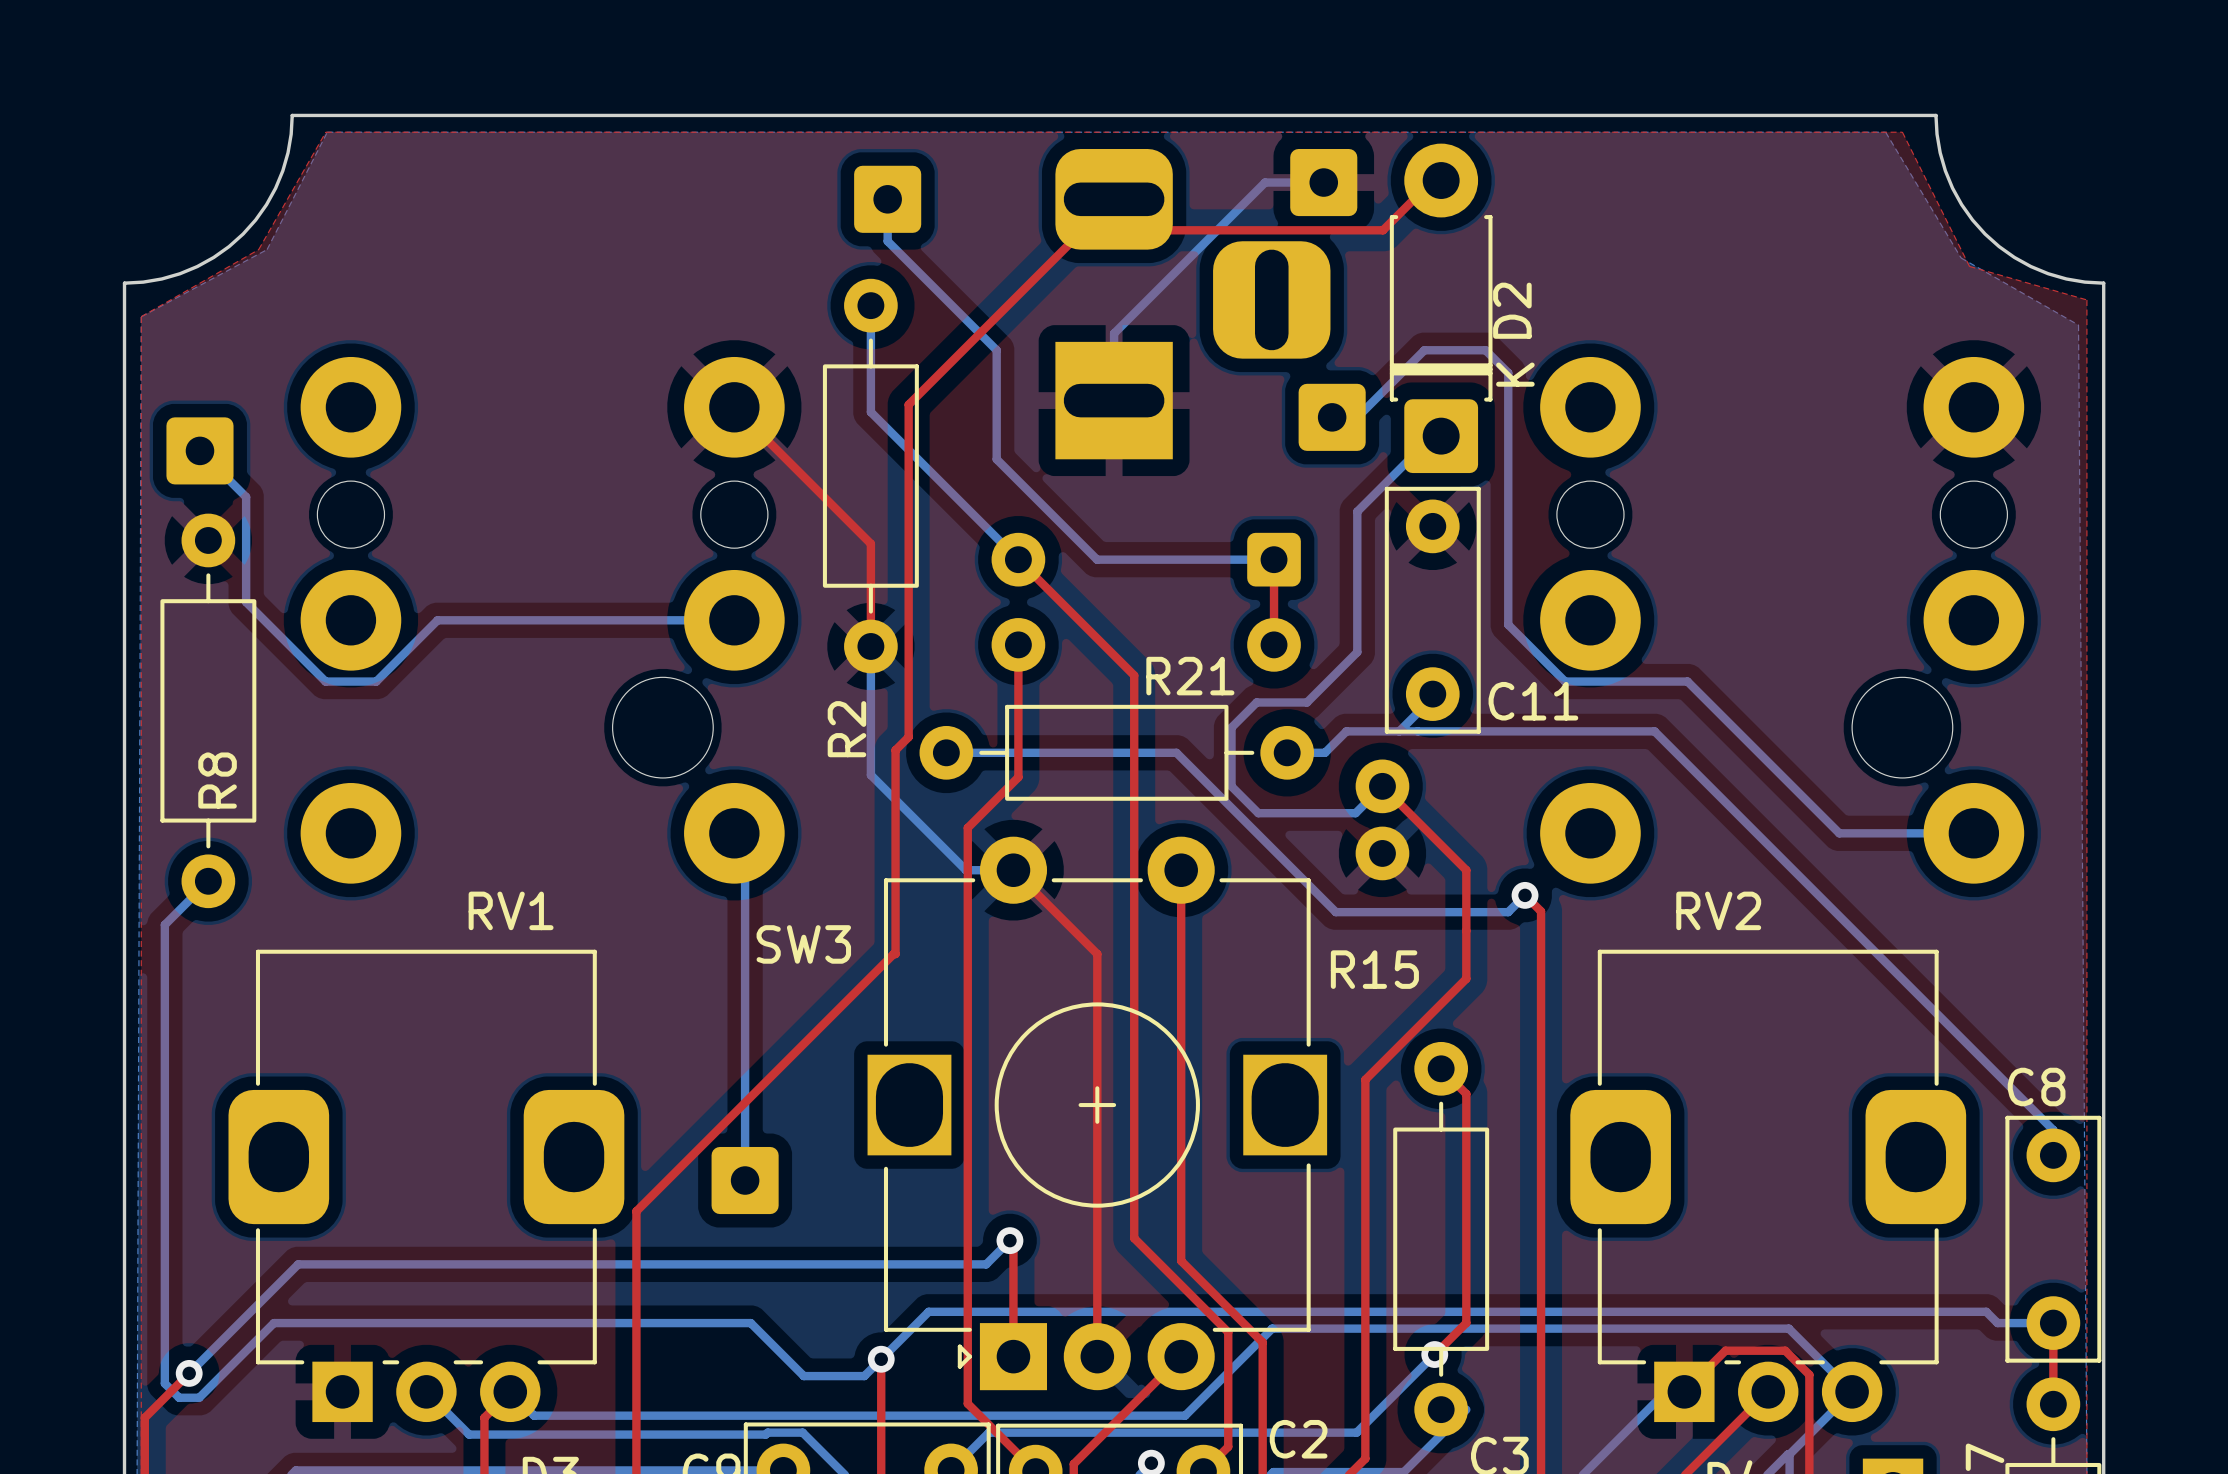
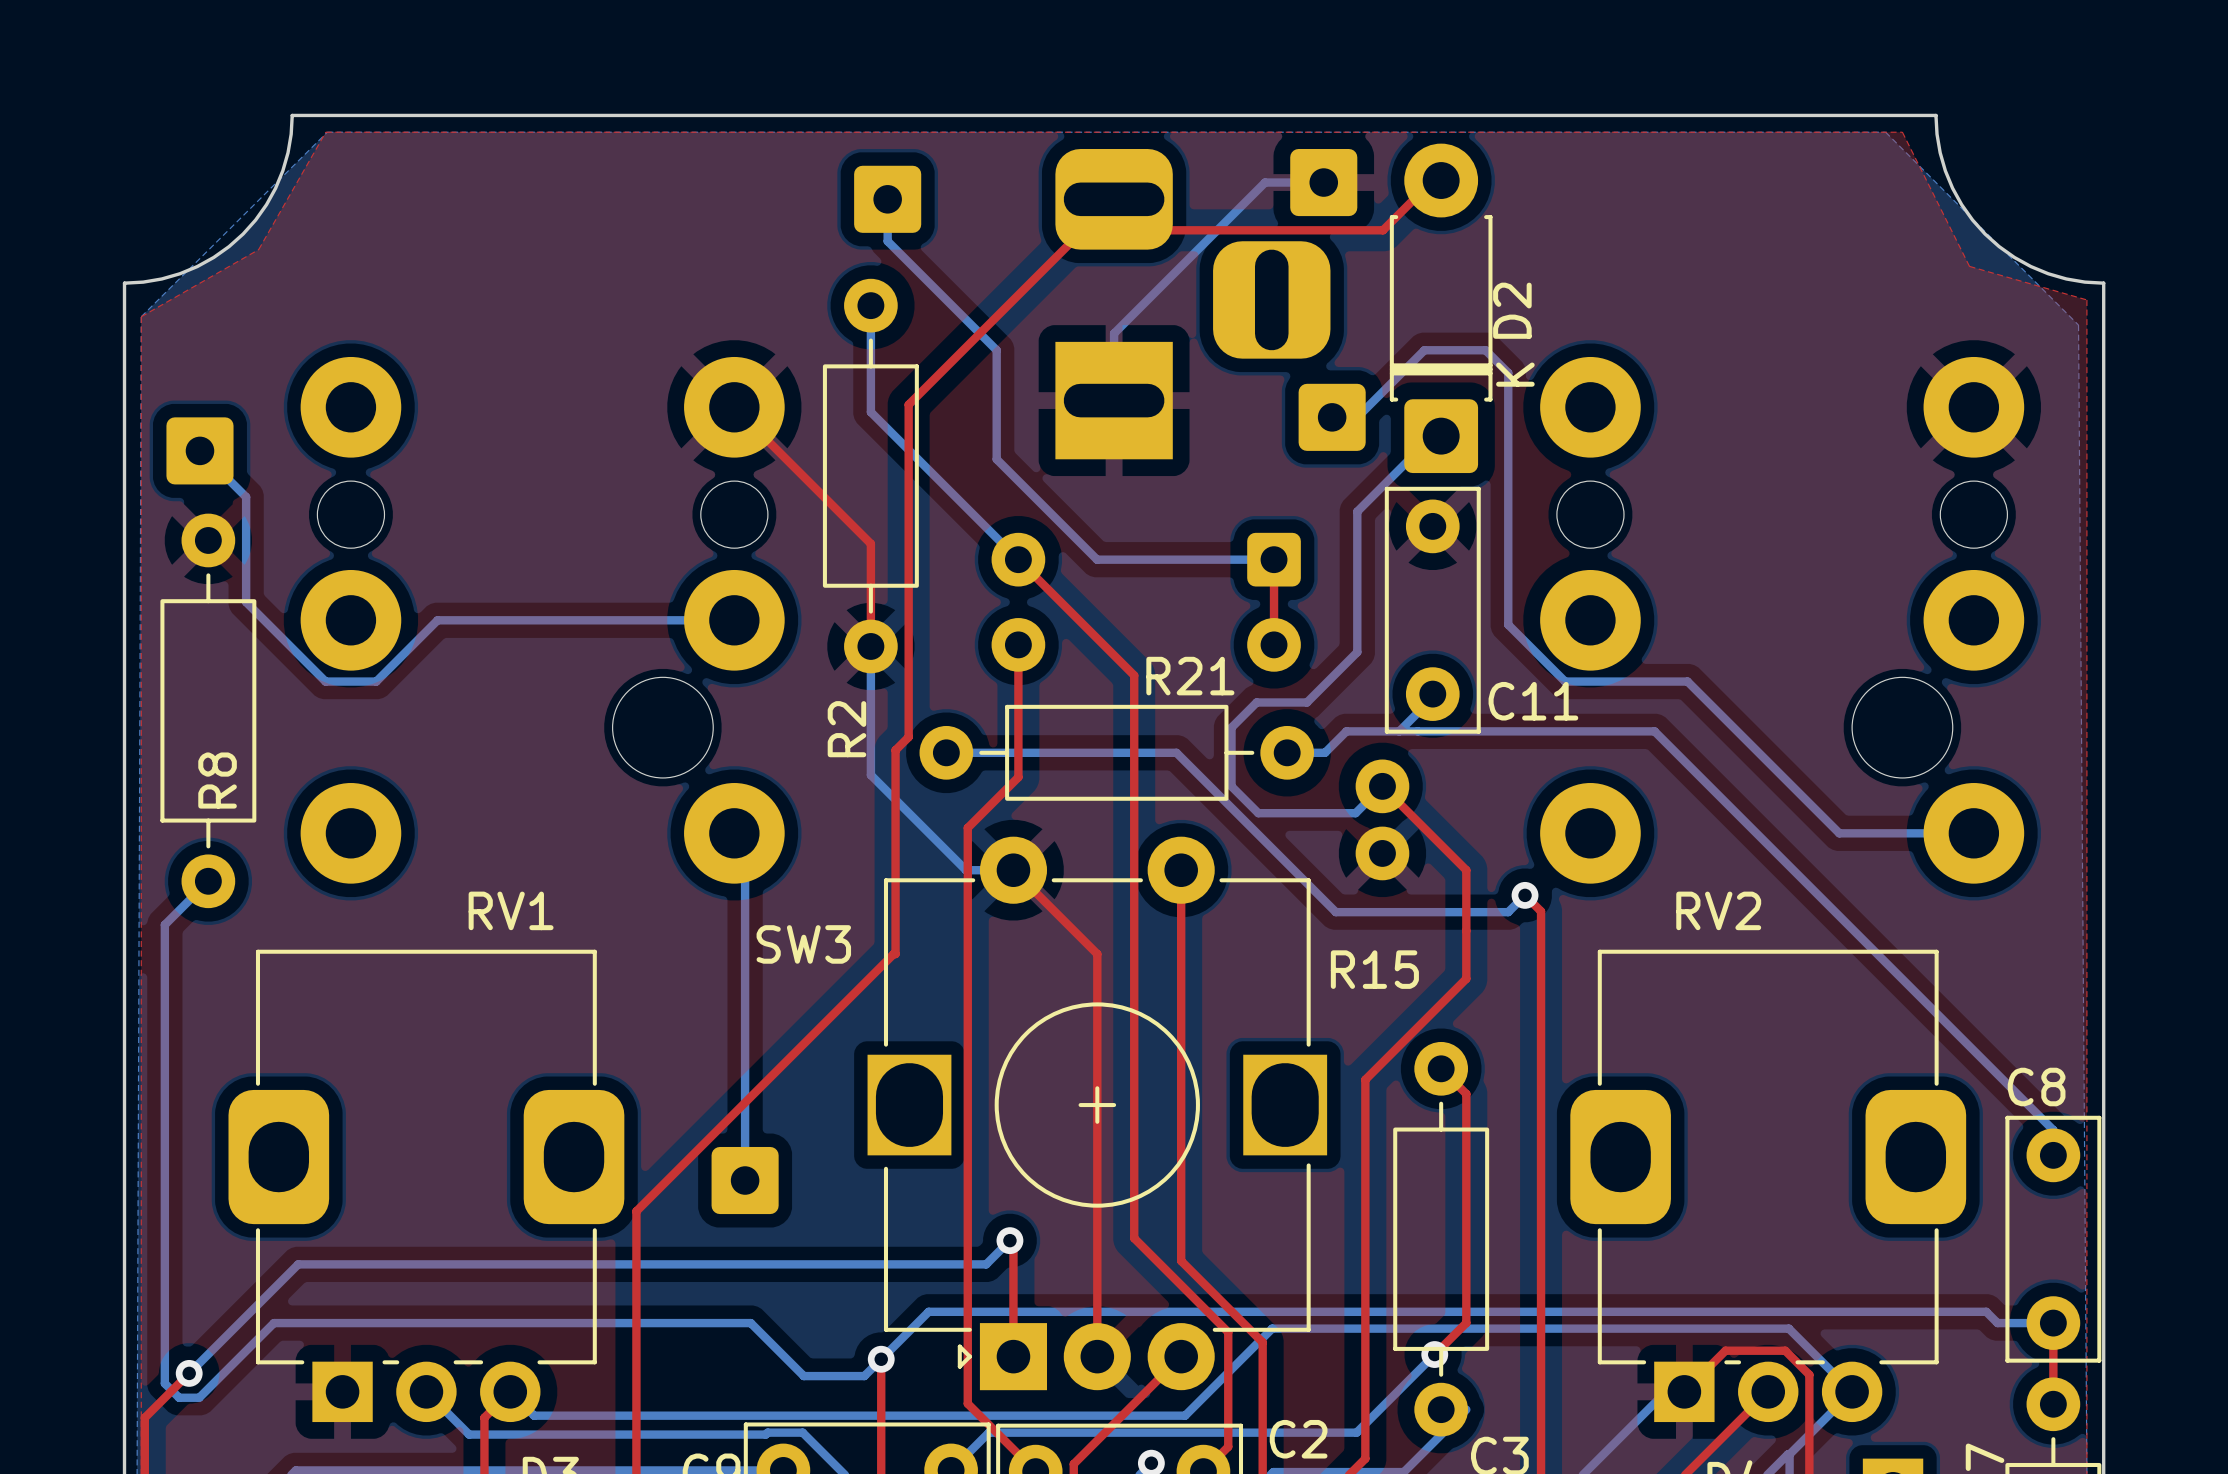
bottom zone outline: (327, 132) (267, 249) (141, 316) -> (327, 132) (141, 316)
bottom zone outline: (1885, 132) (1961, 258) (2078, 325) -> (1885, 132) (2078, 325)

